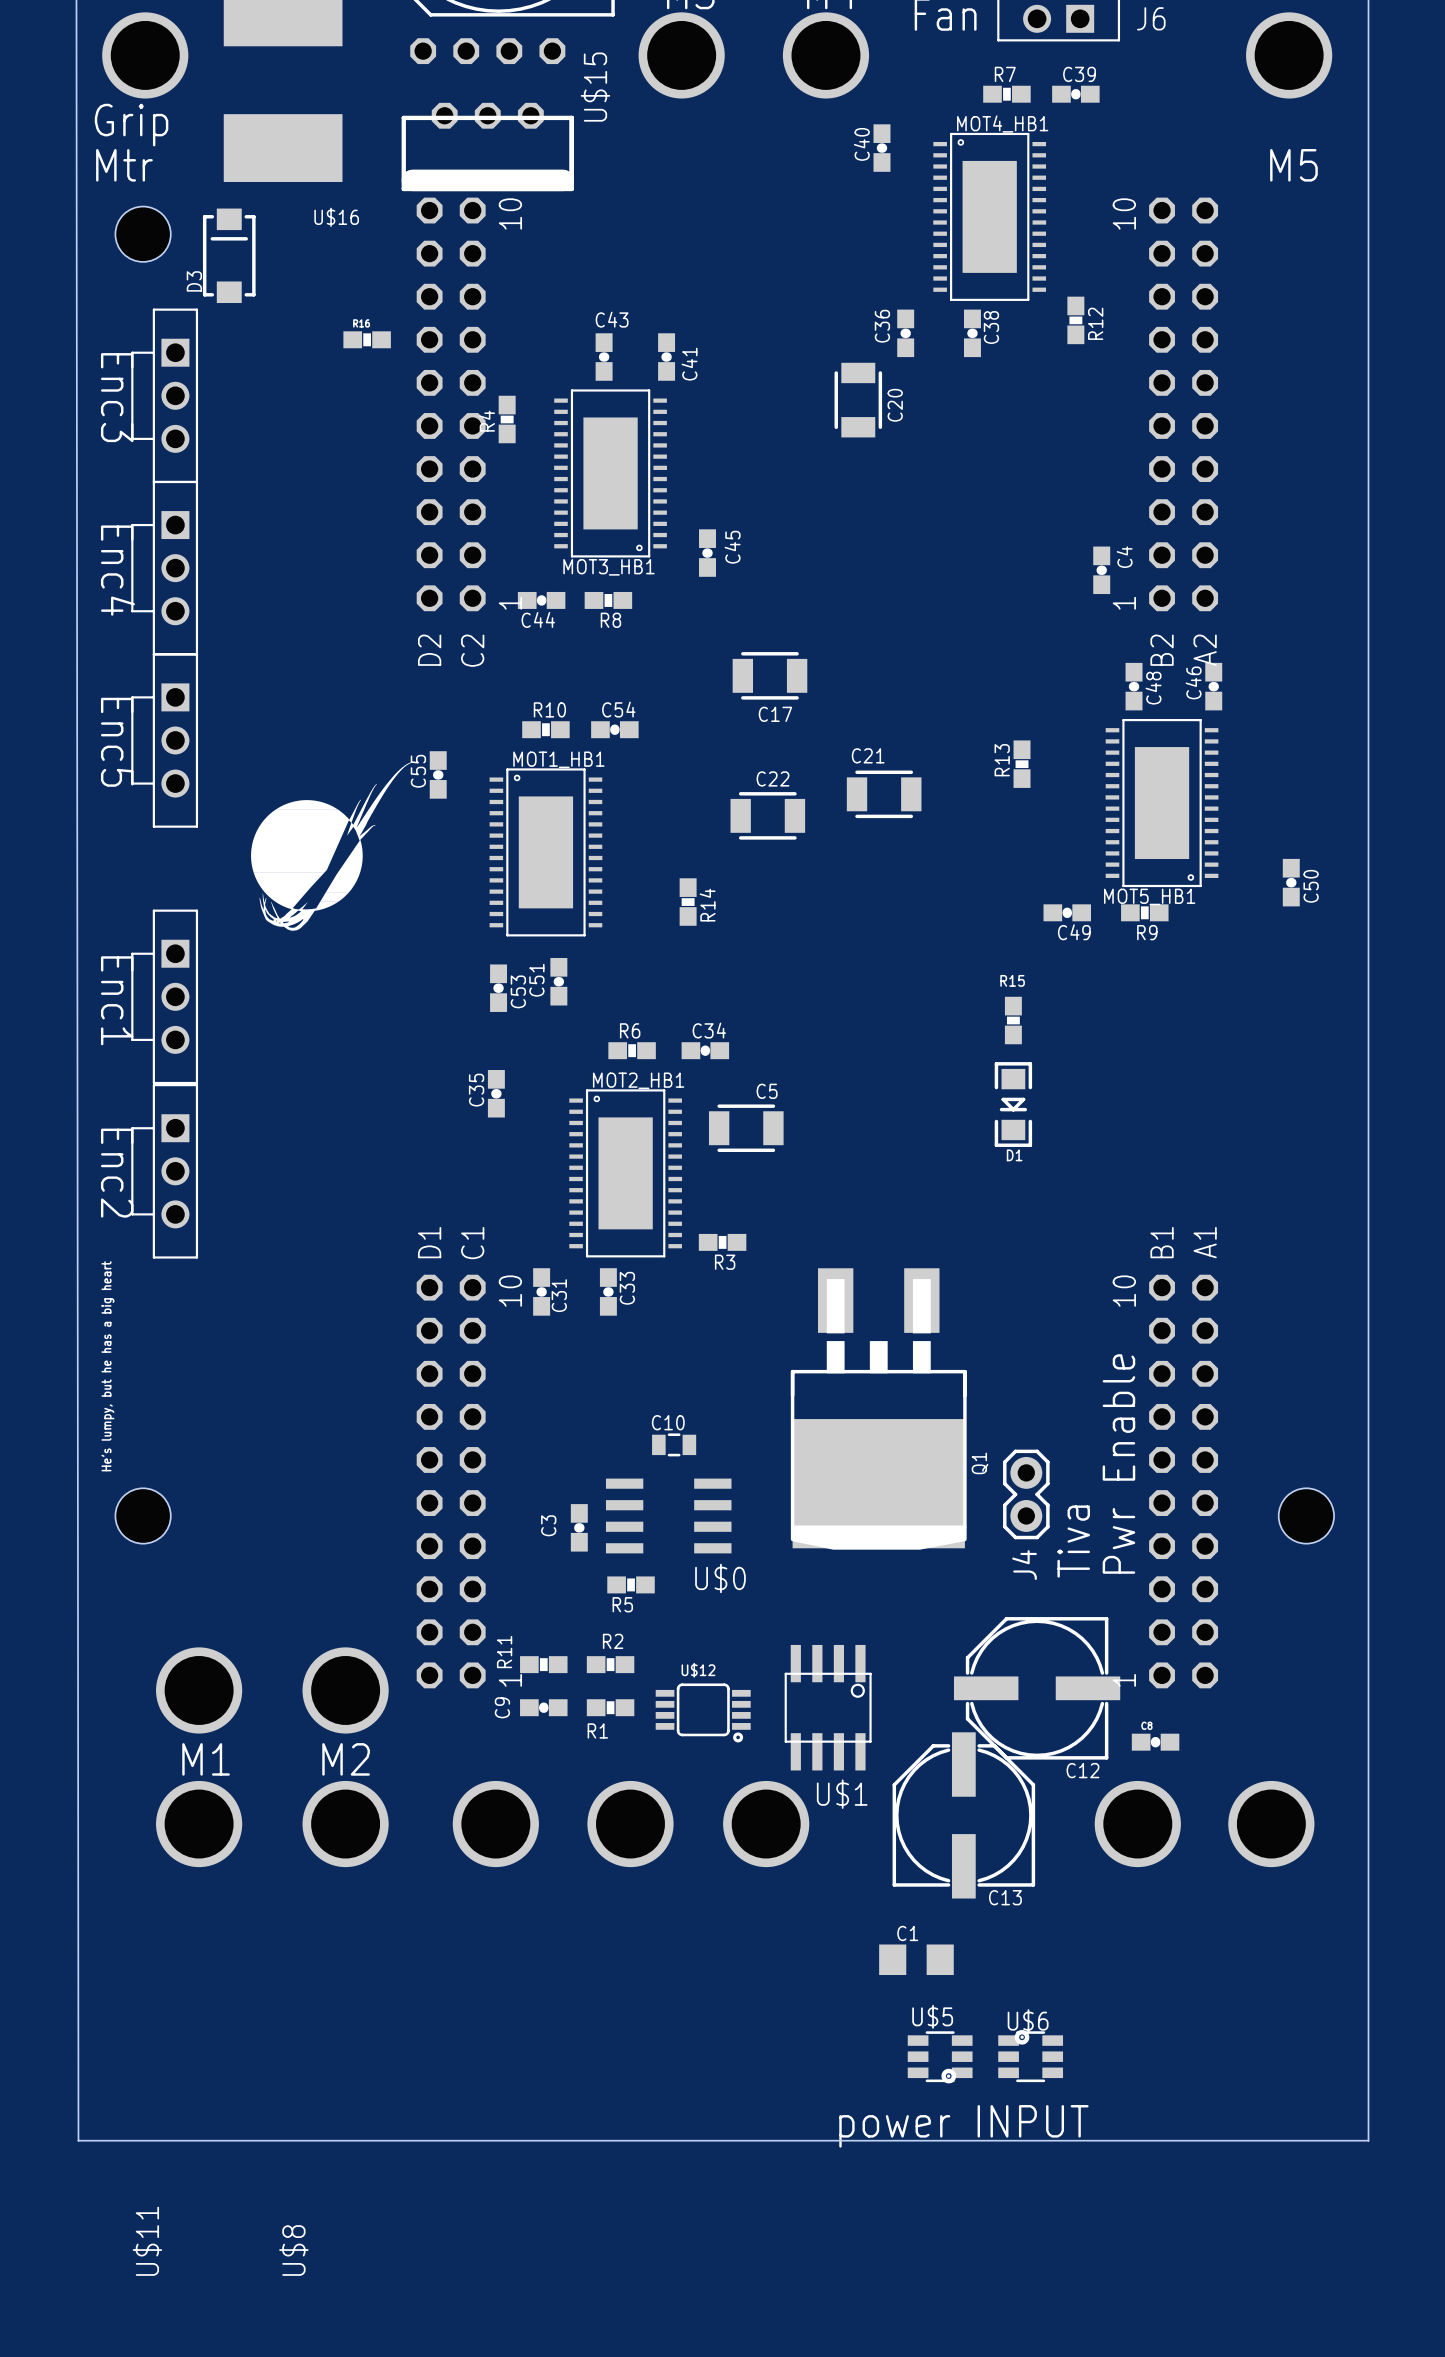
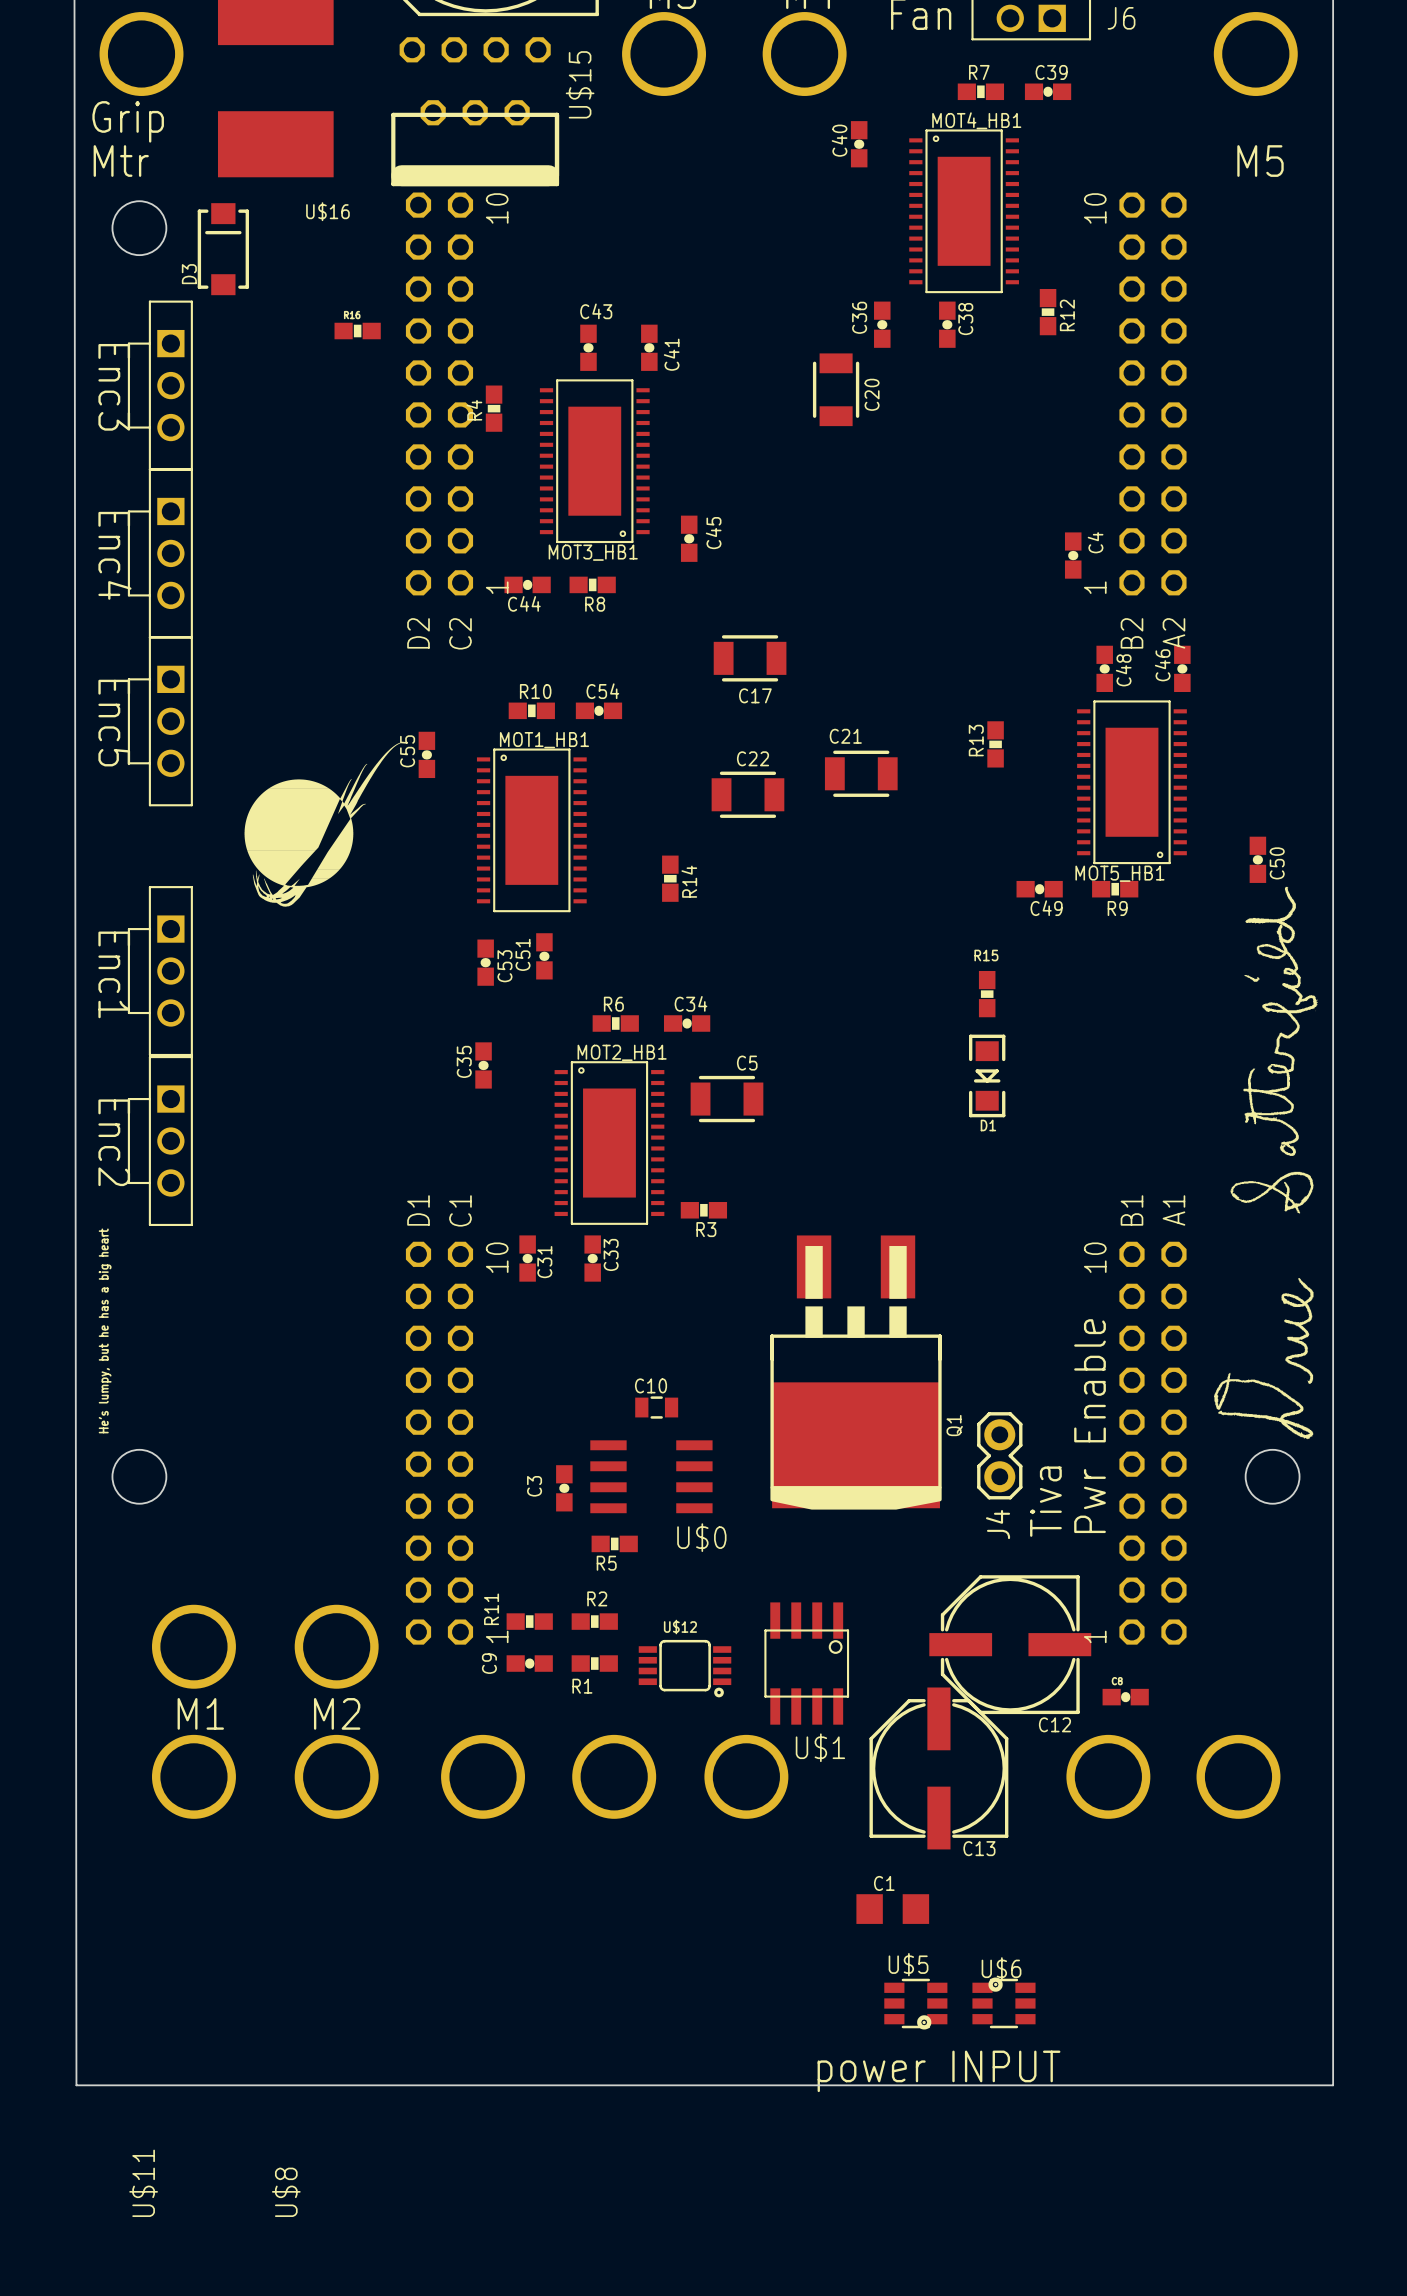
drawing: none -> [1230, 886, 1318, 1214]
drawing: none -> [1244, 975, 1260, 982]
drawing: none -> [1281, 1278, 1314, 1384]
drawing: none -> [1214, 1372, 1314, 1440]

